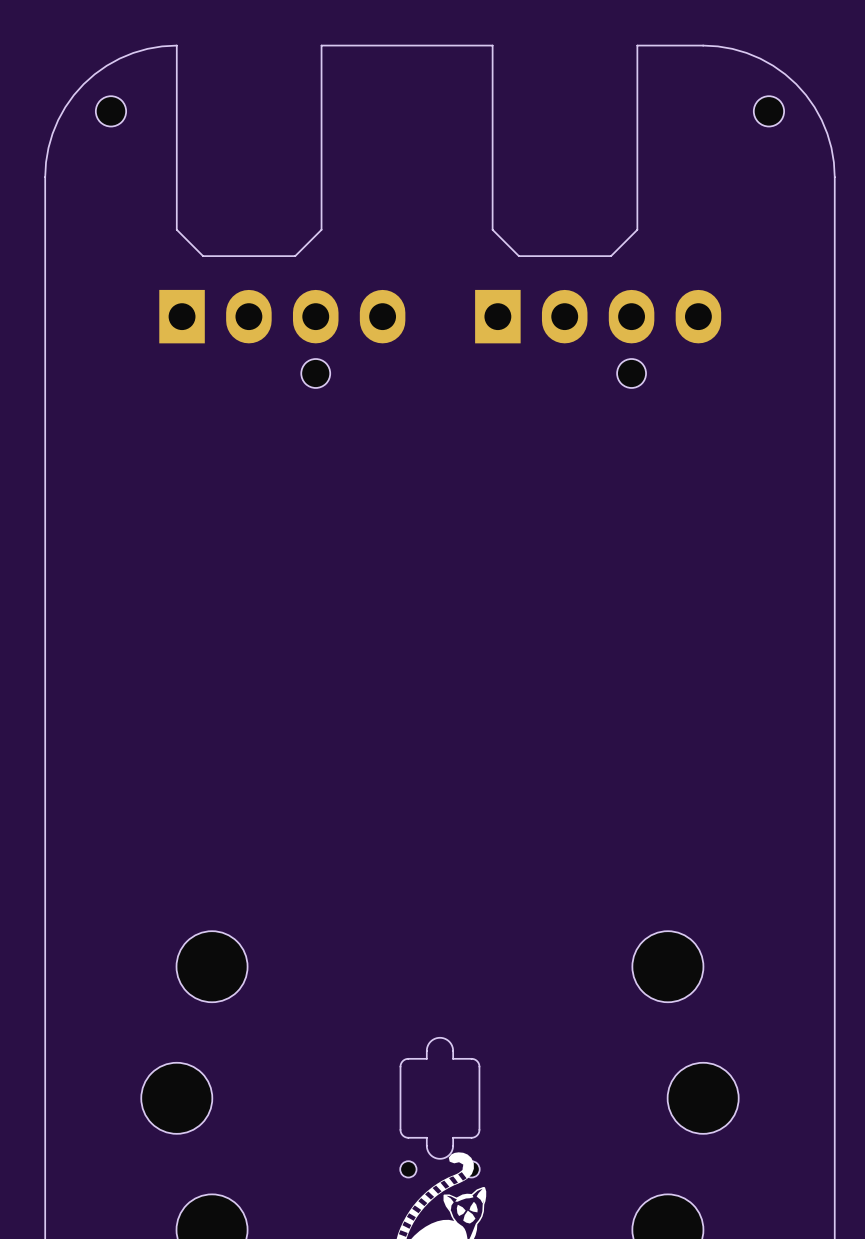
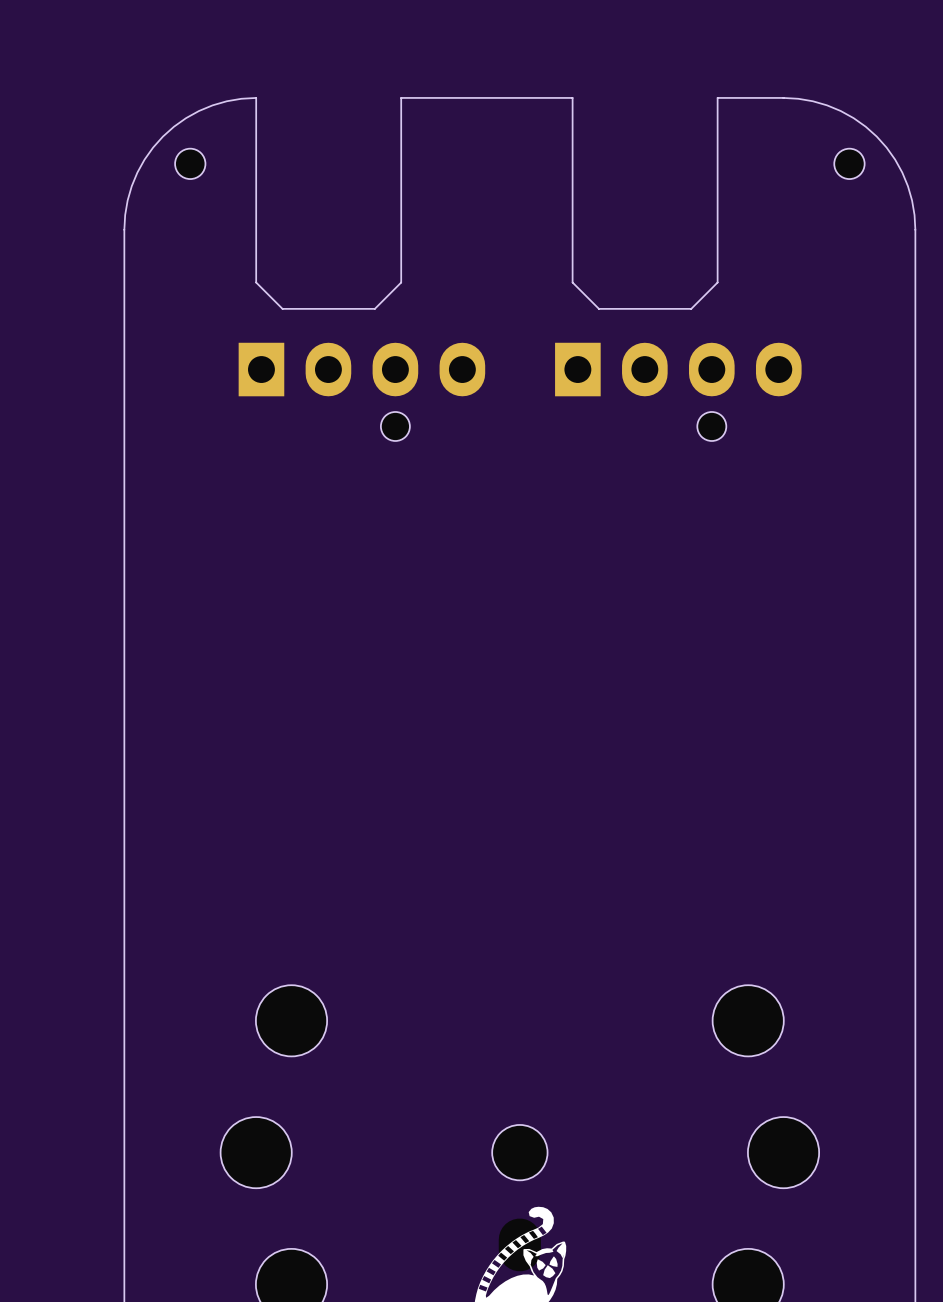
part: (439, 1107) -> none
part: none -> (519, 1198)

